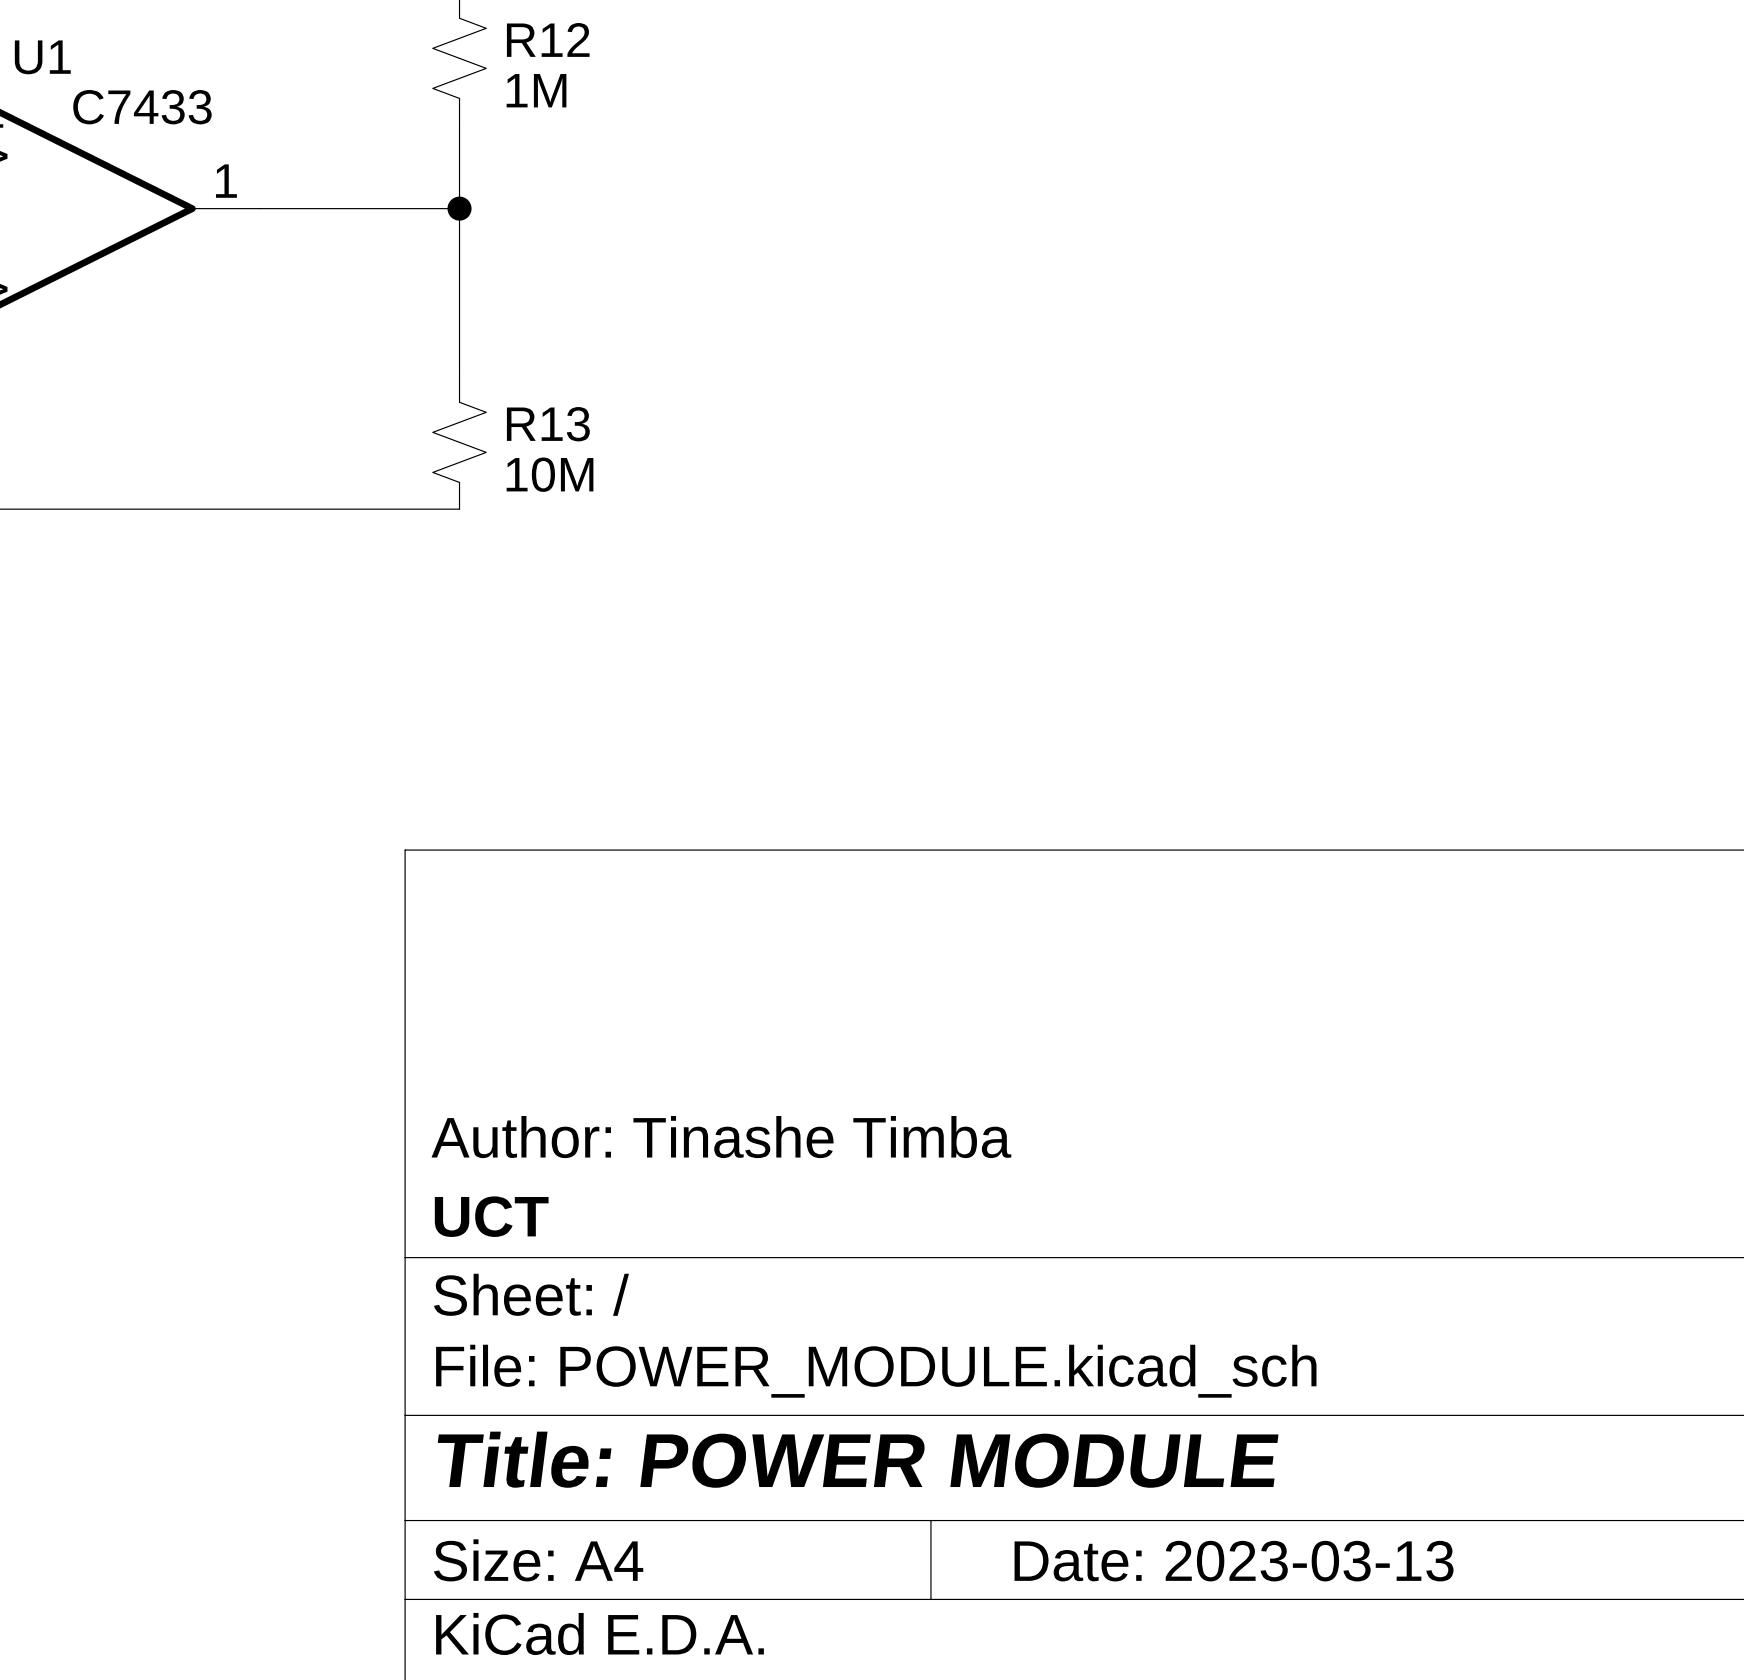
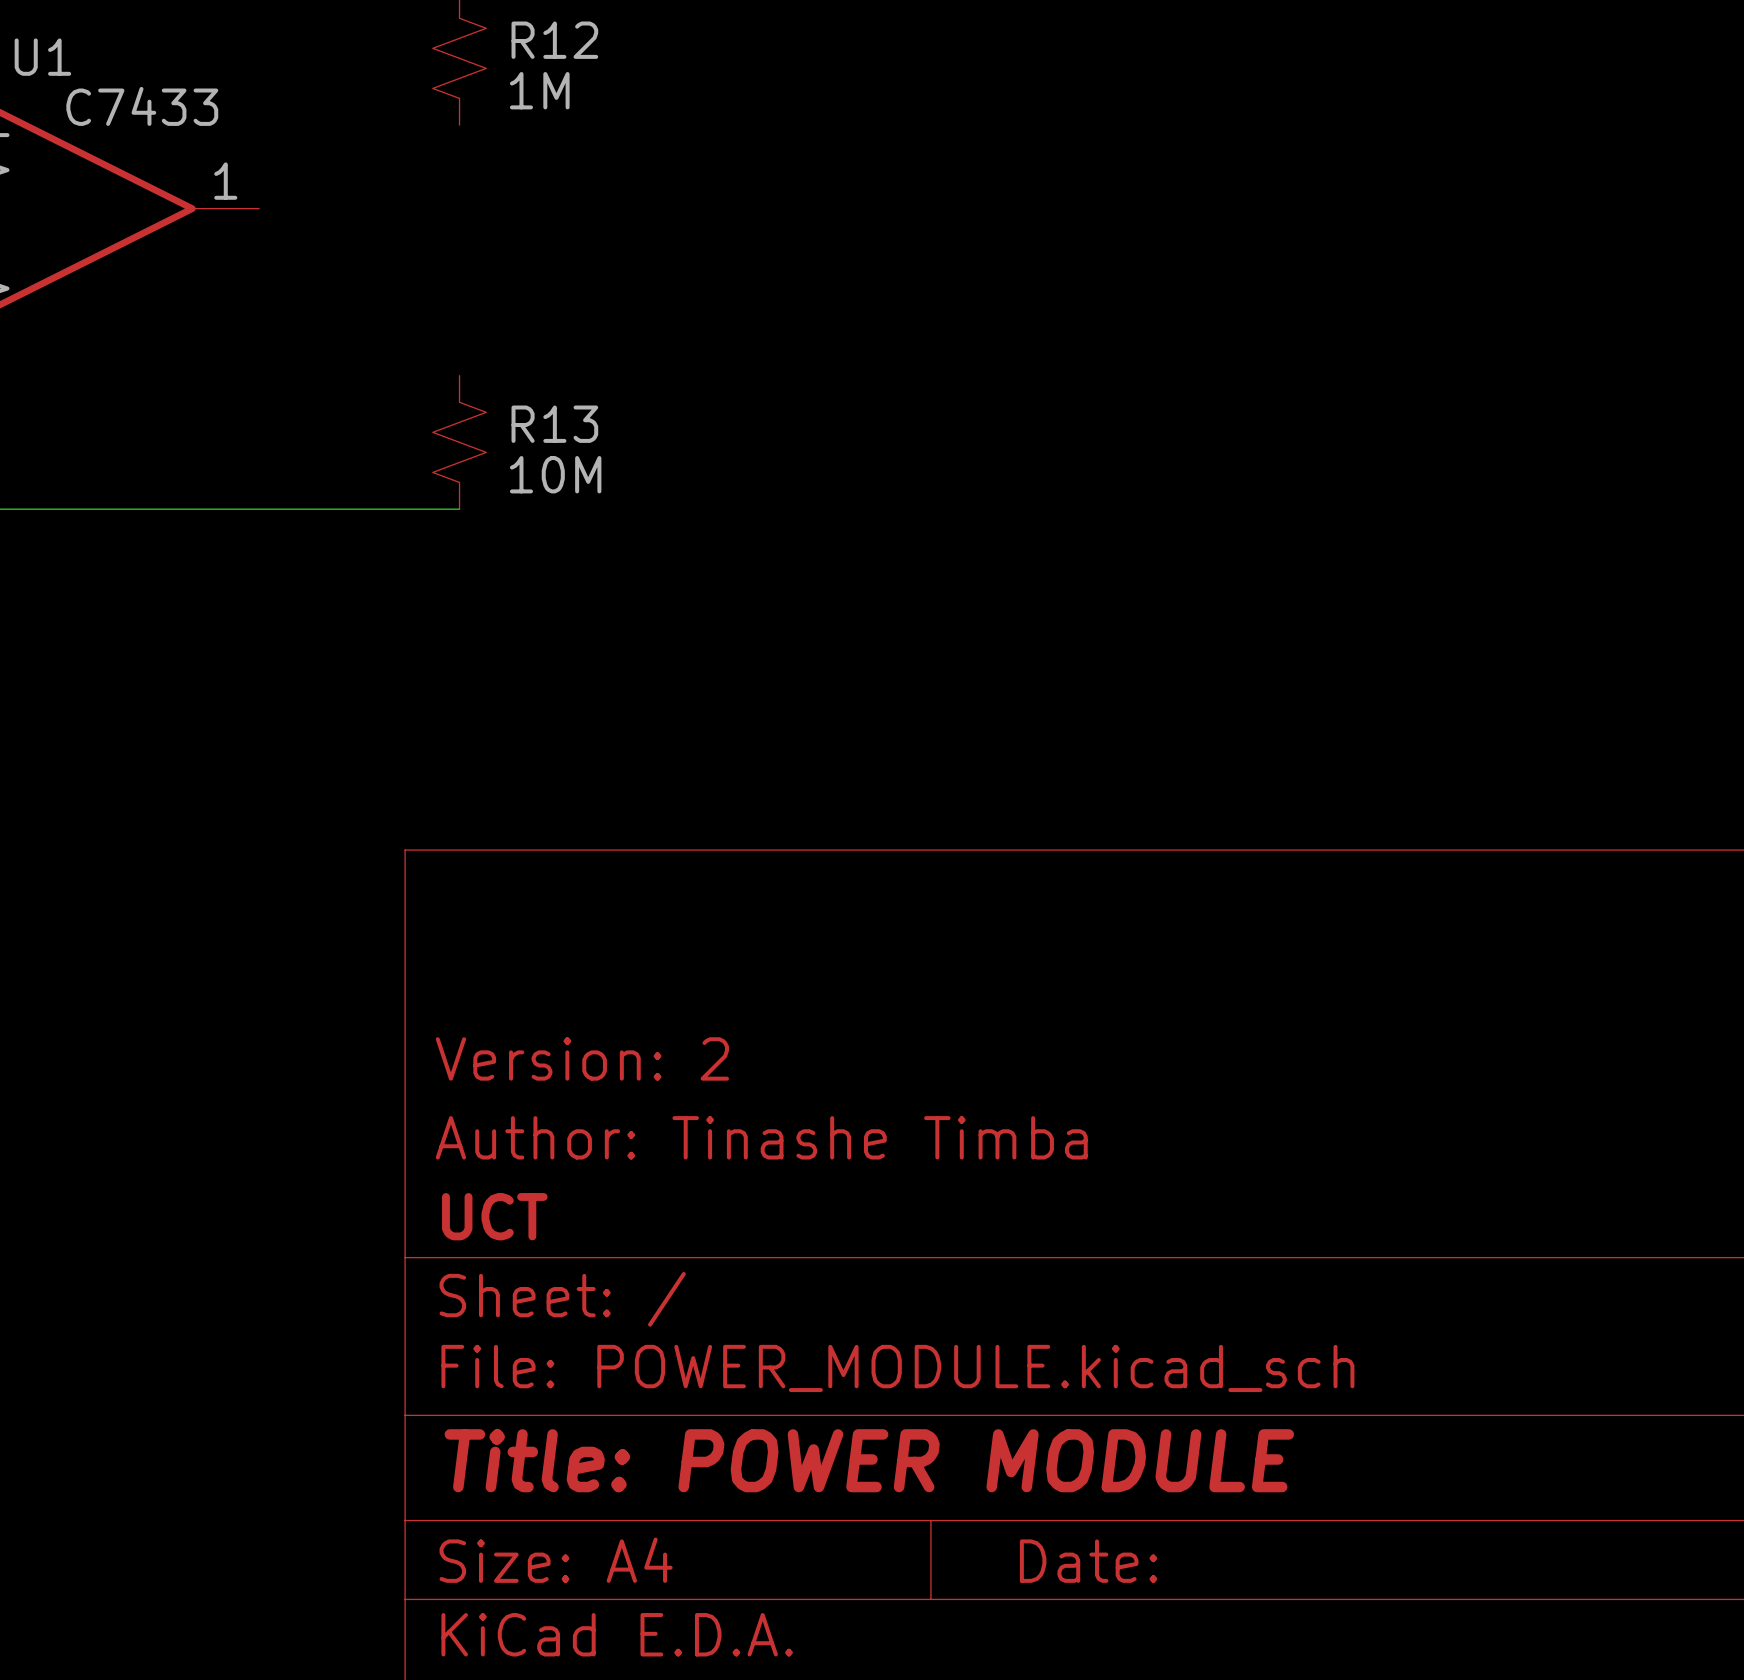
wire: (459, 125) (459, 375) -> none
wire: (259, 208) (459, 208) -> none
junction: (459, 208) -> none
title block: none -> Version: 2 (582, 1058)
title block: Date: 2023-03-13 (1234, 1561) -> Date: (1088, 1561)

